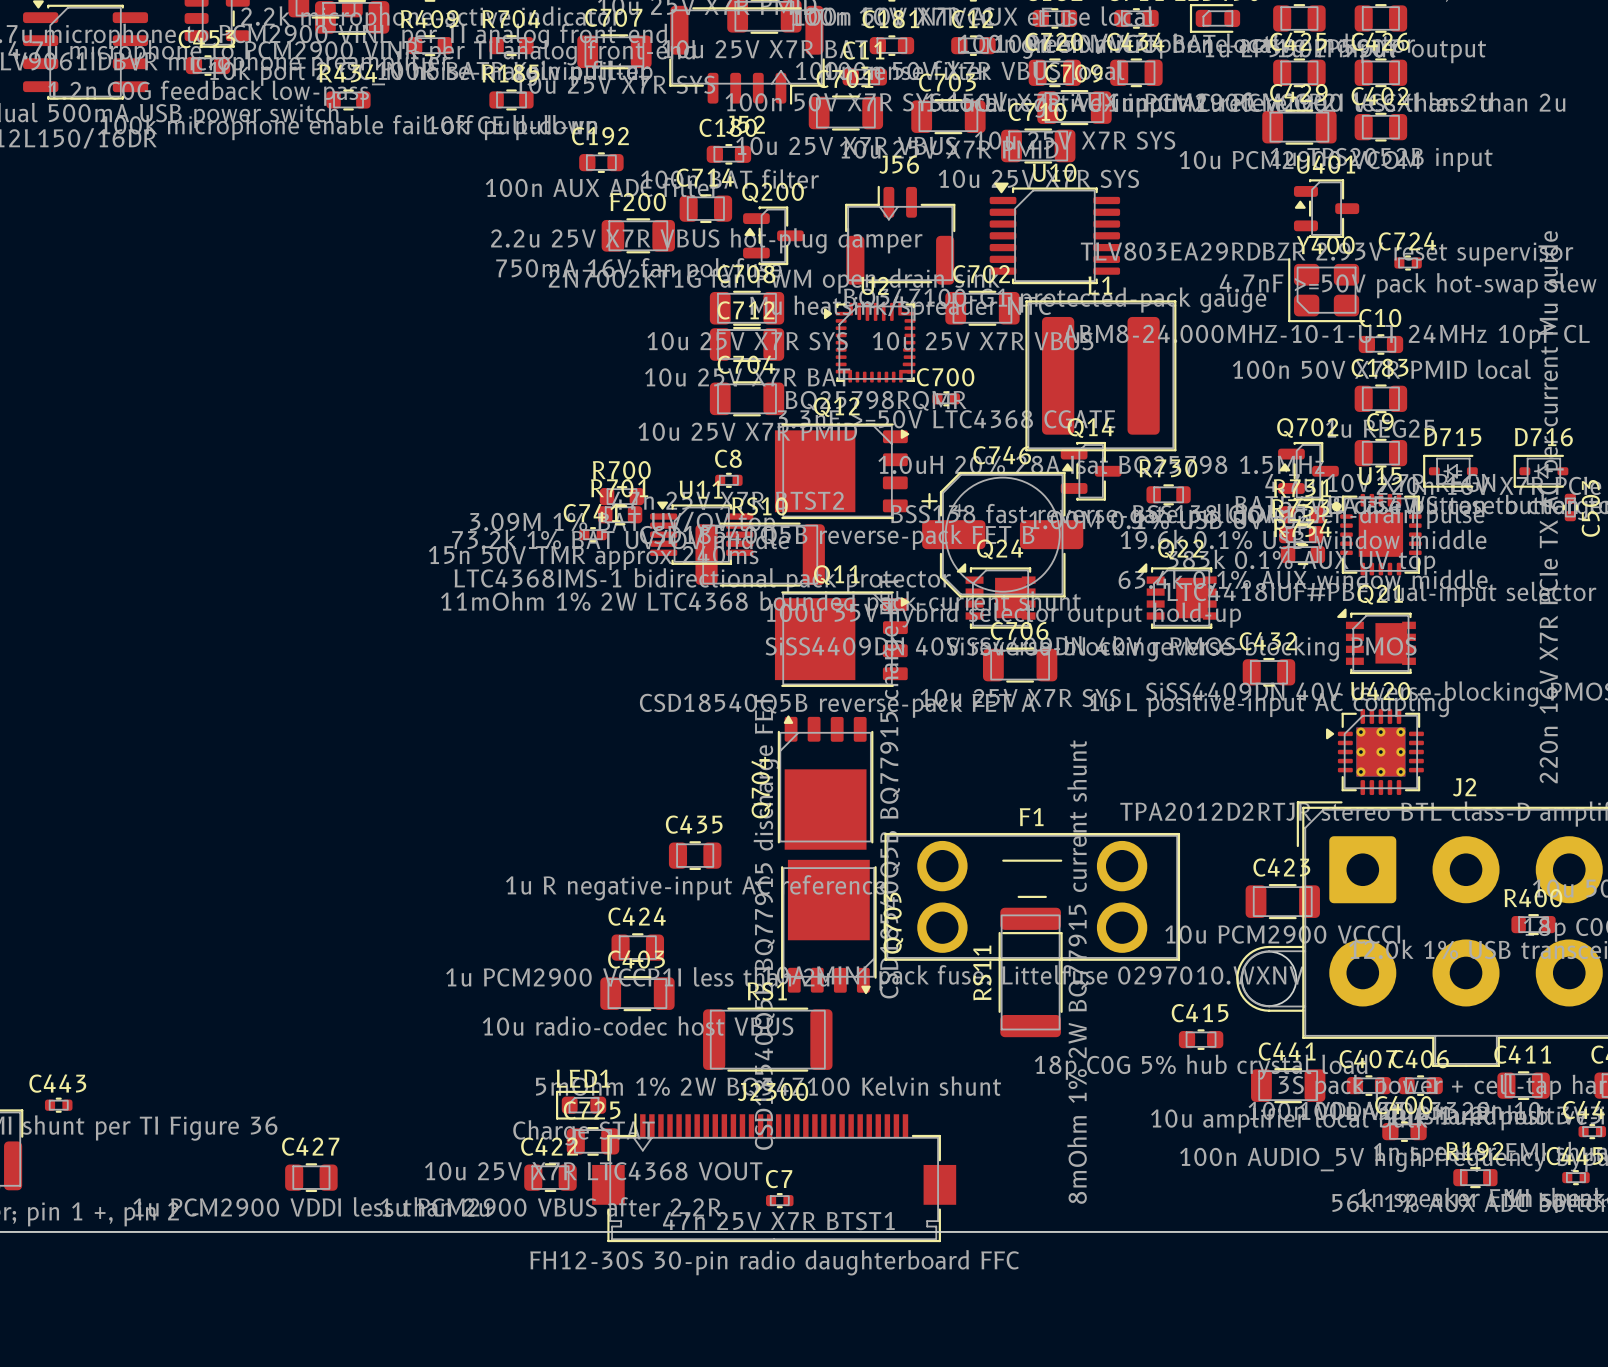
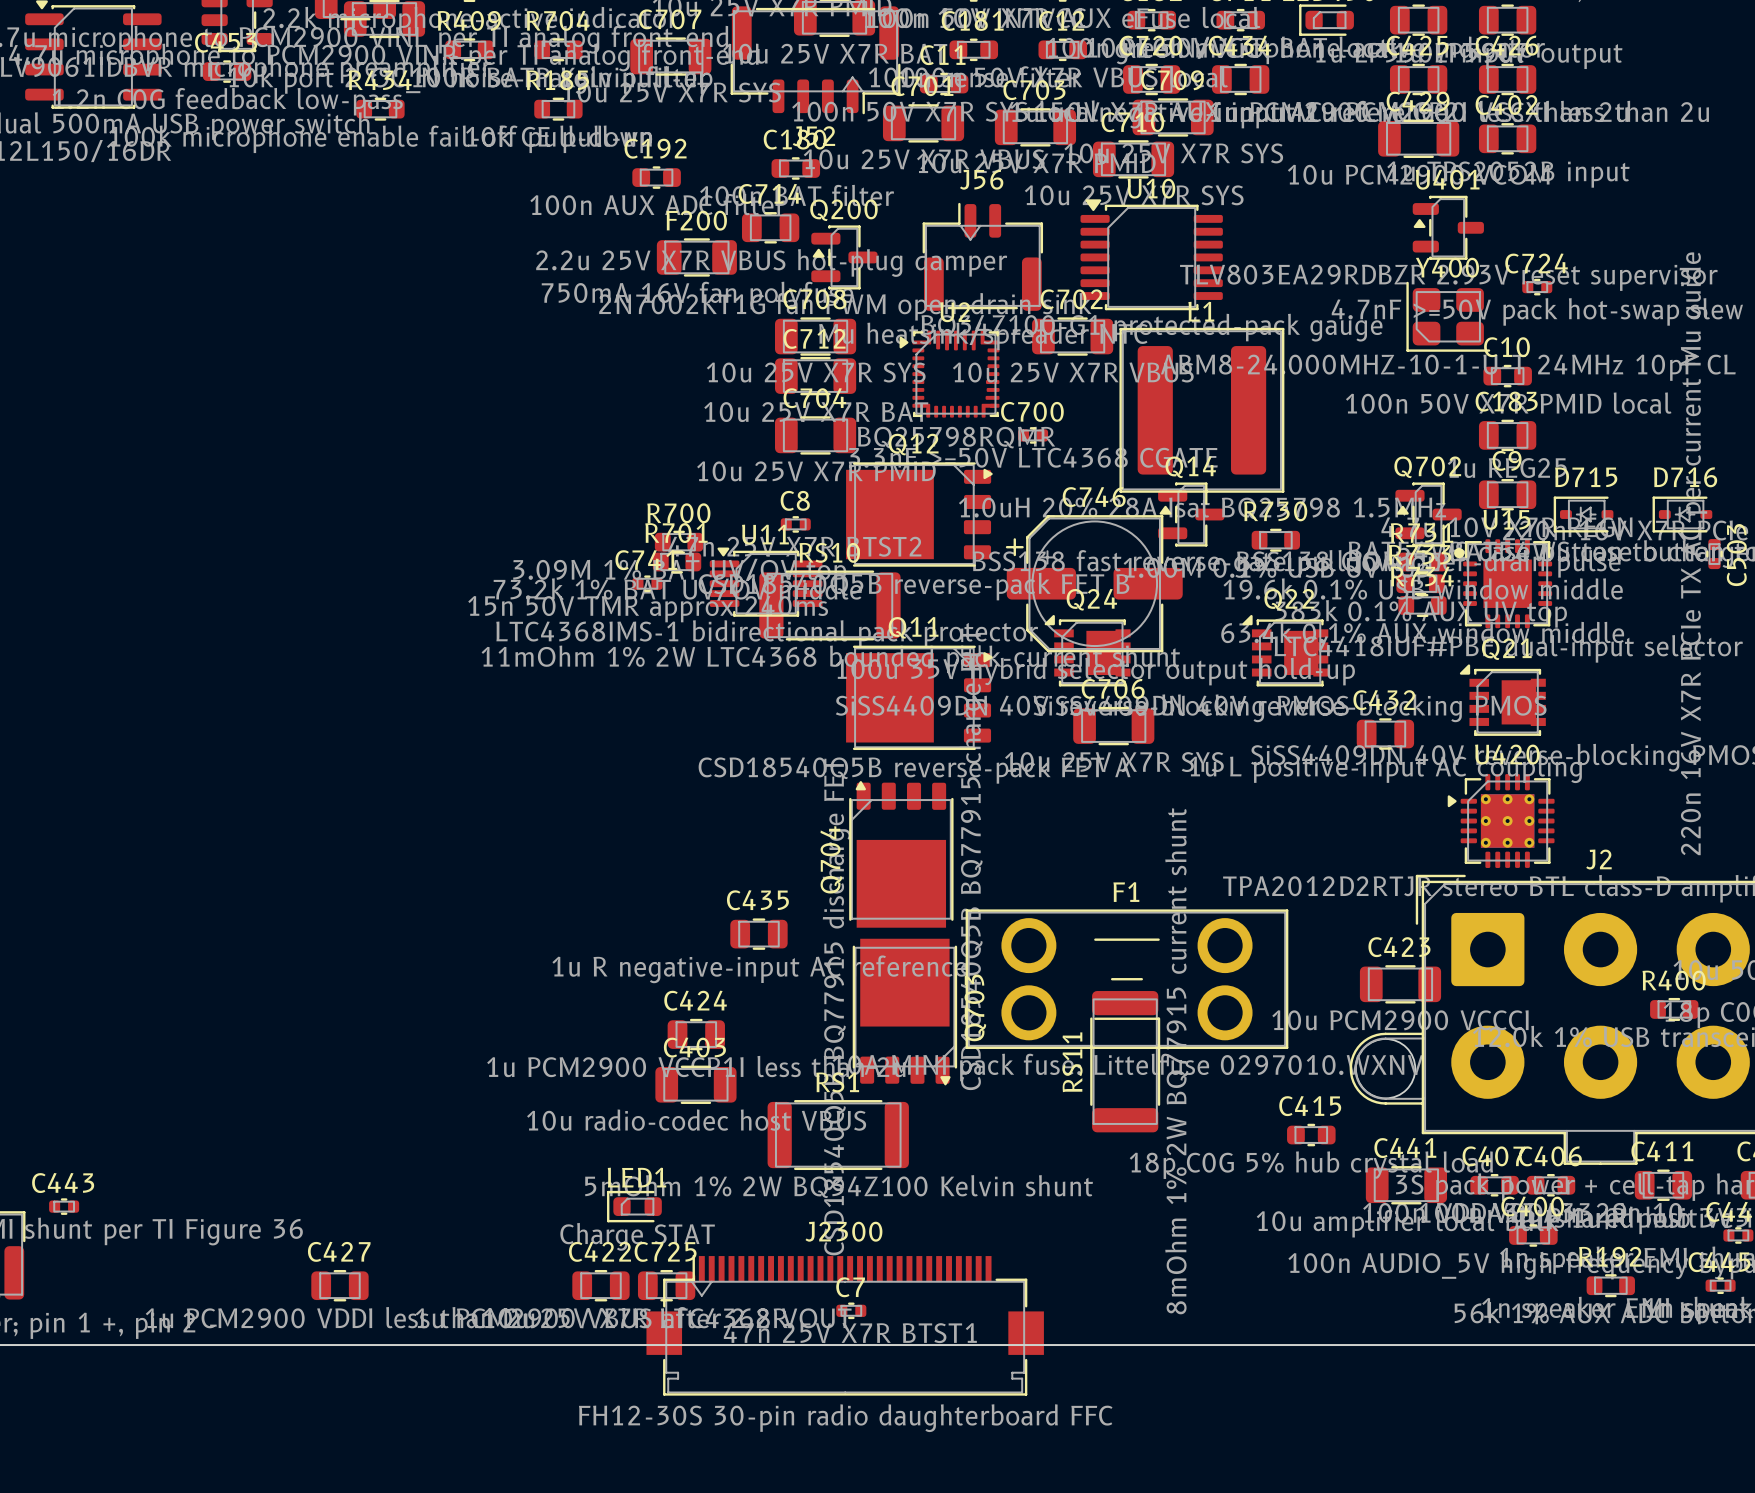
C725 position: (593, 1141) -> (666, 1285)
J2300 position: (774, 1177) -> (845, 1325)

